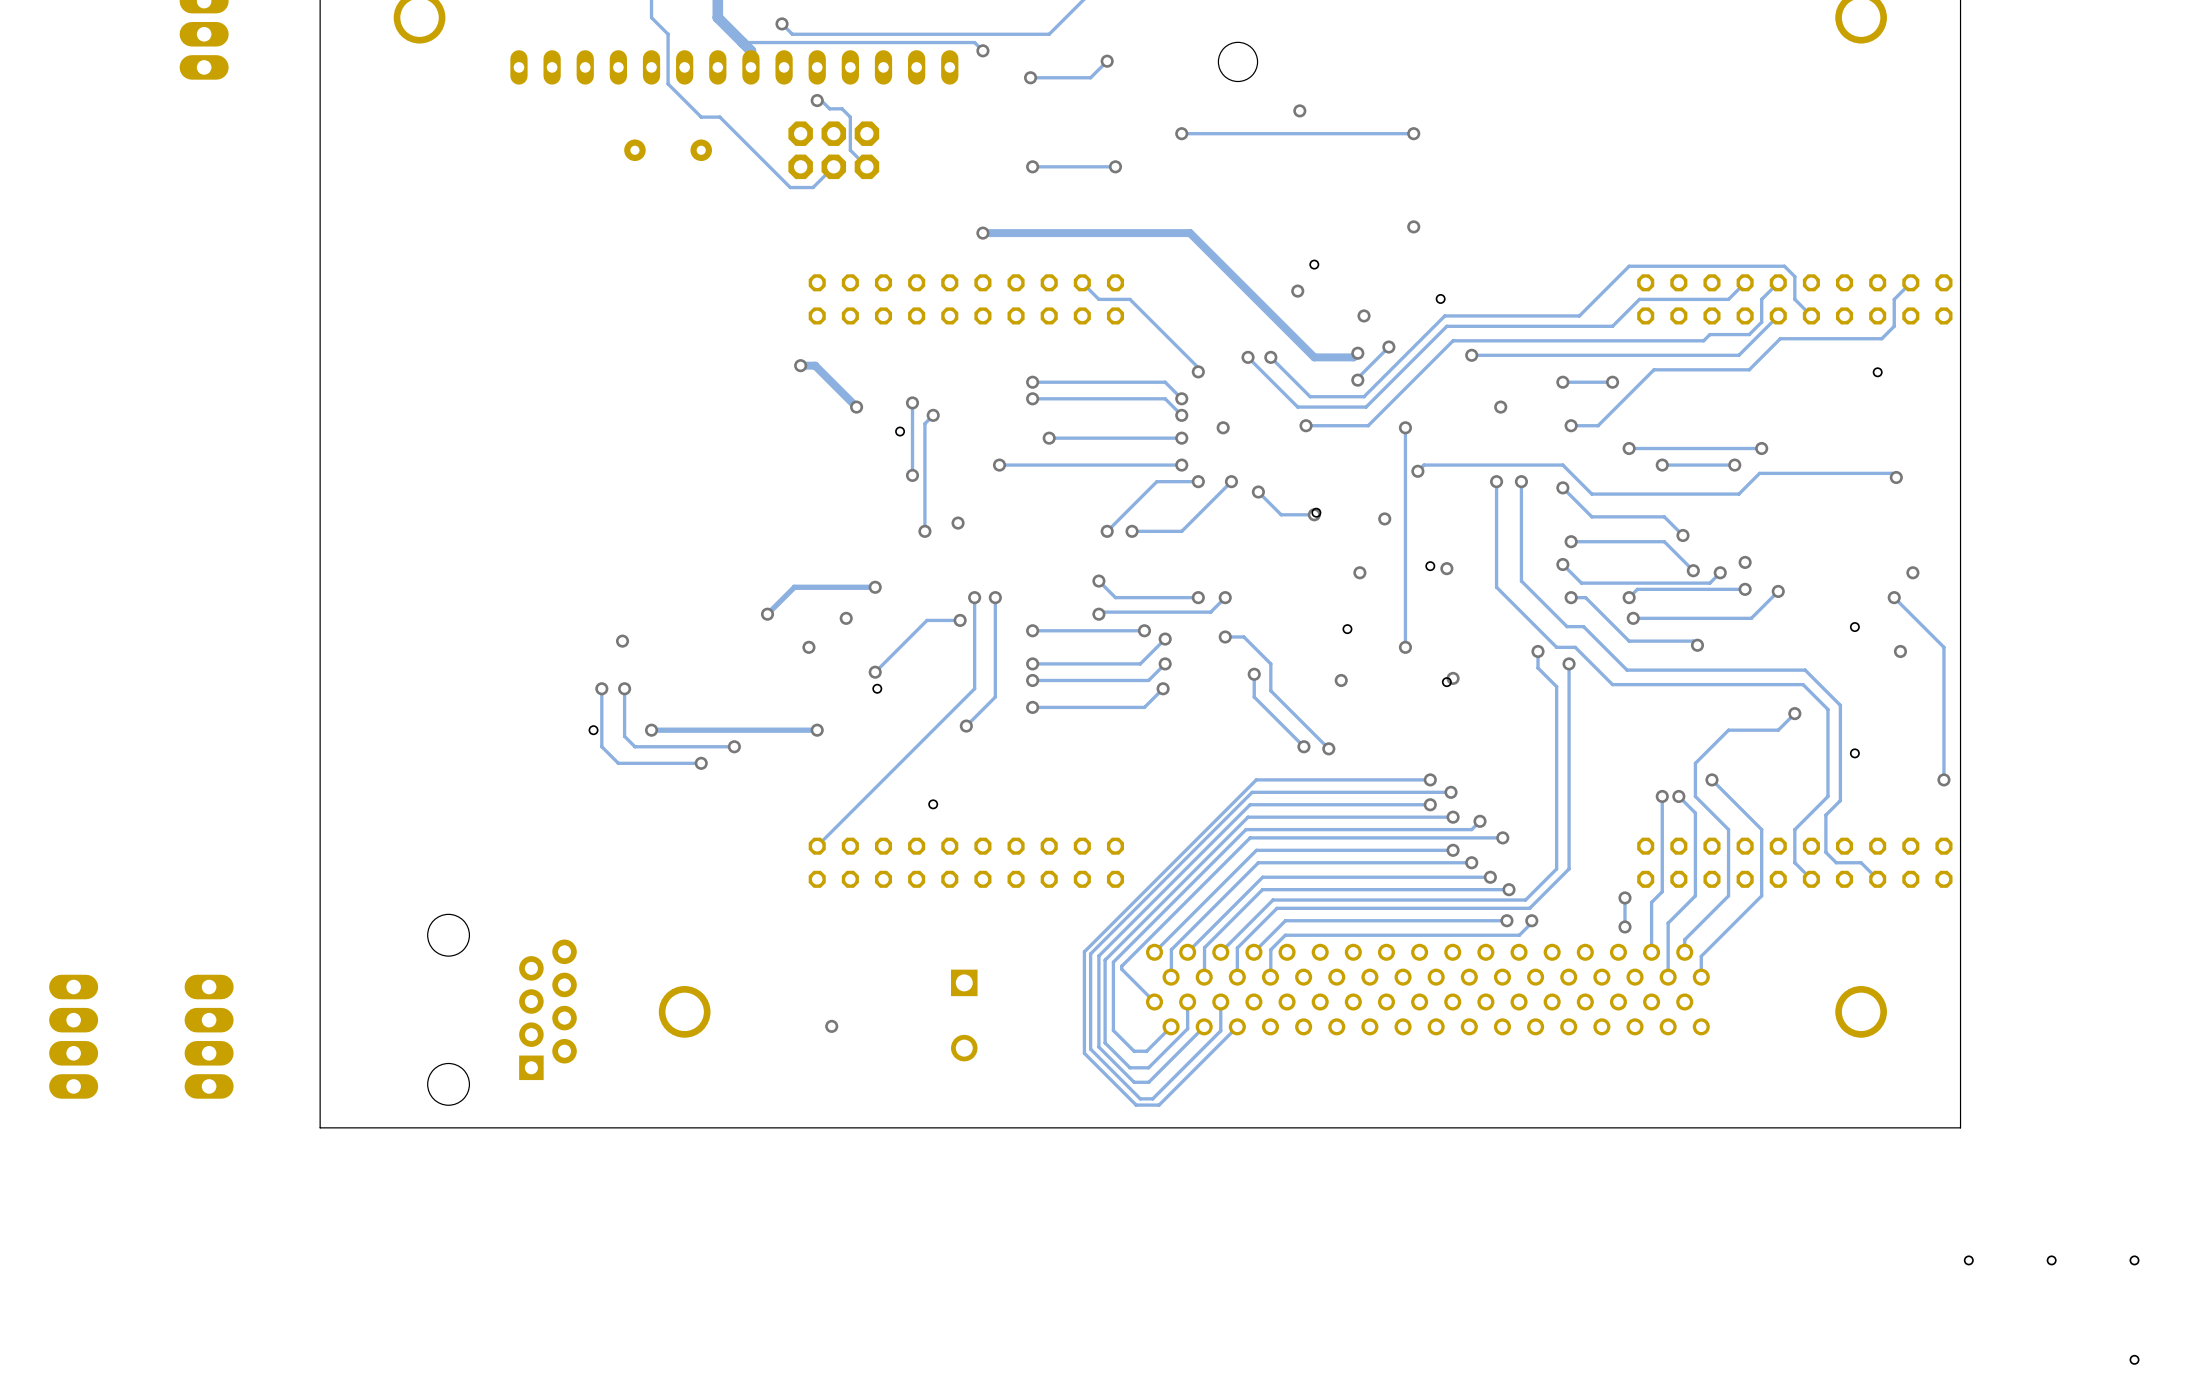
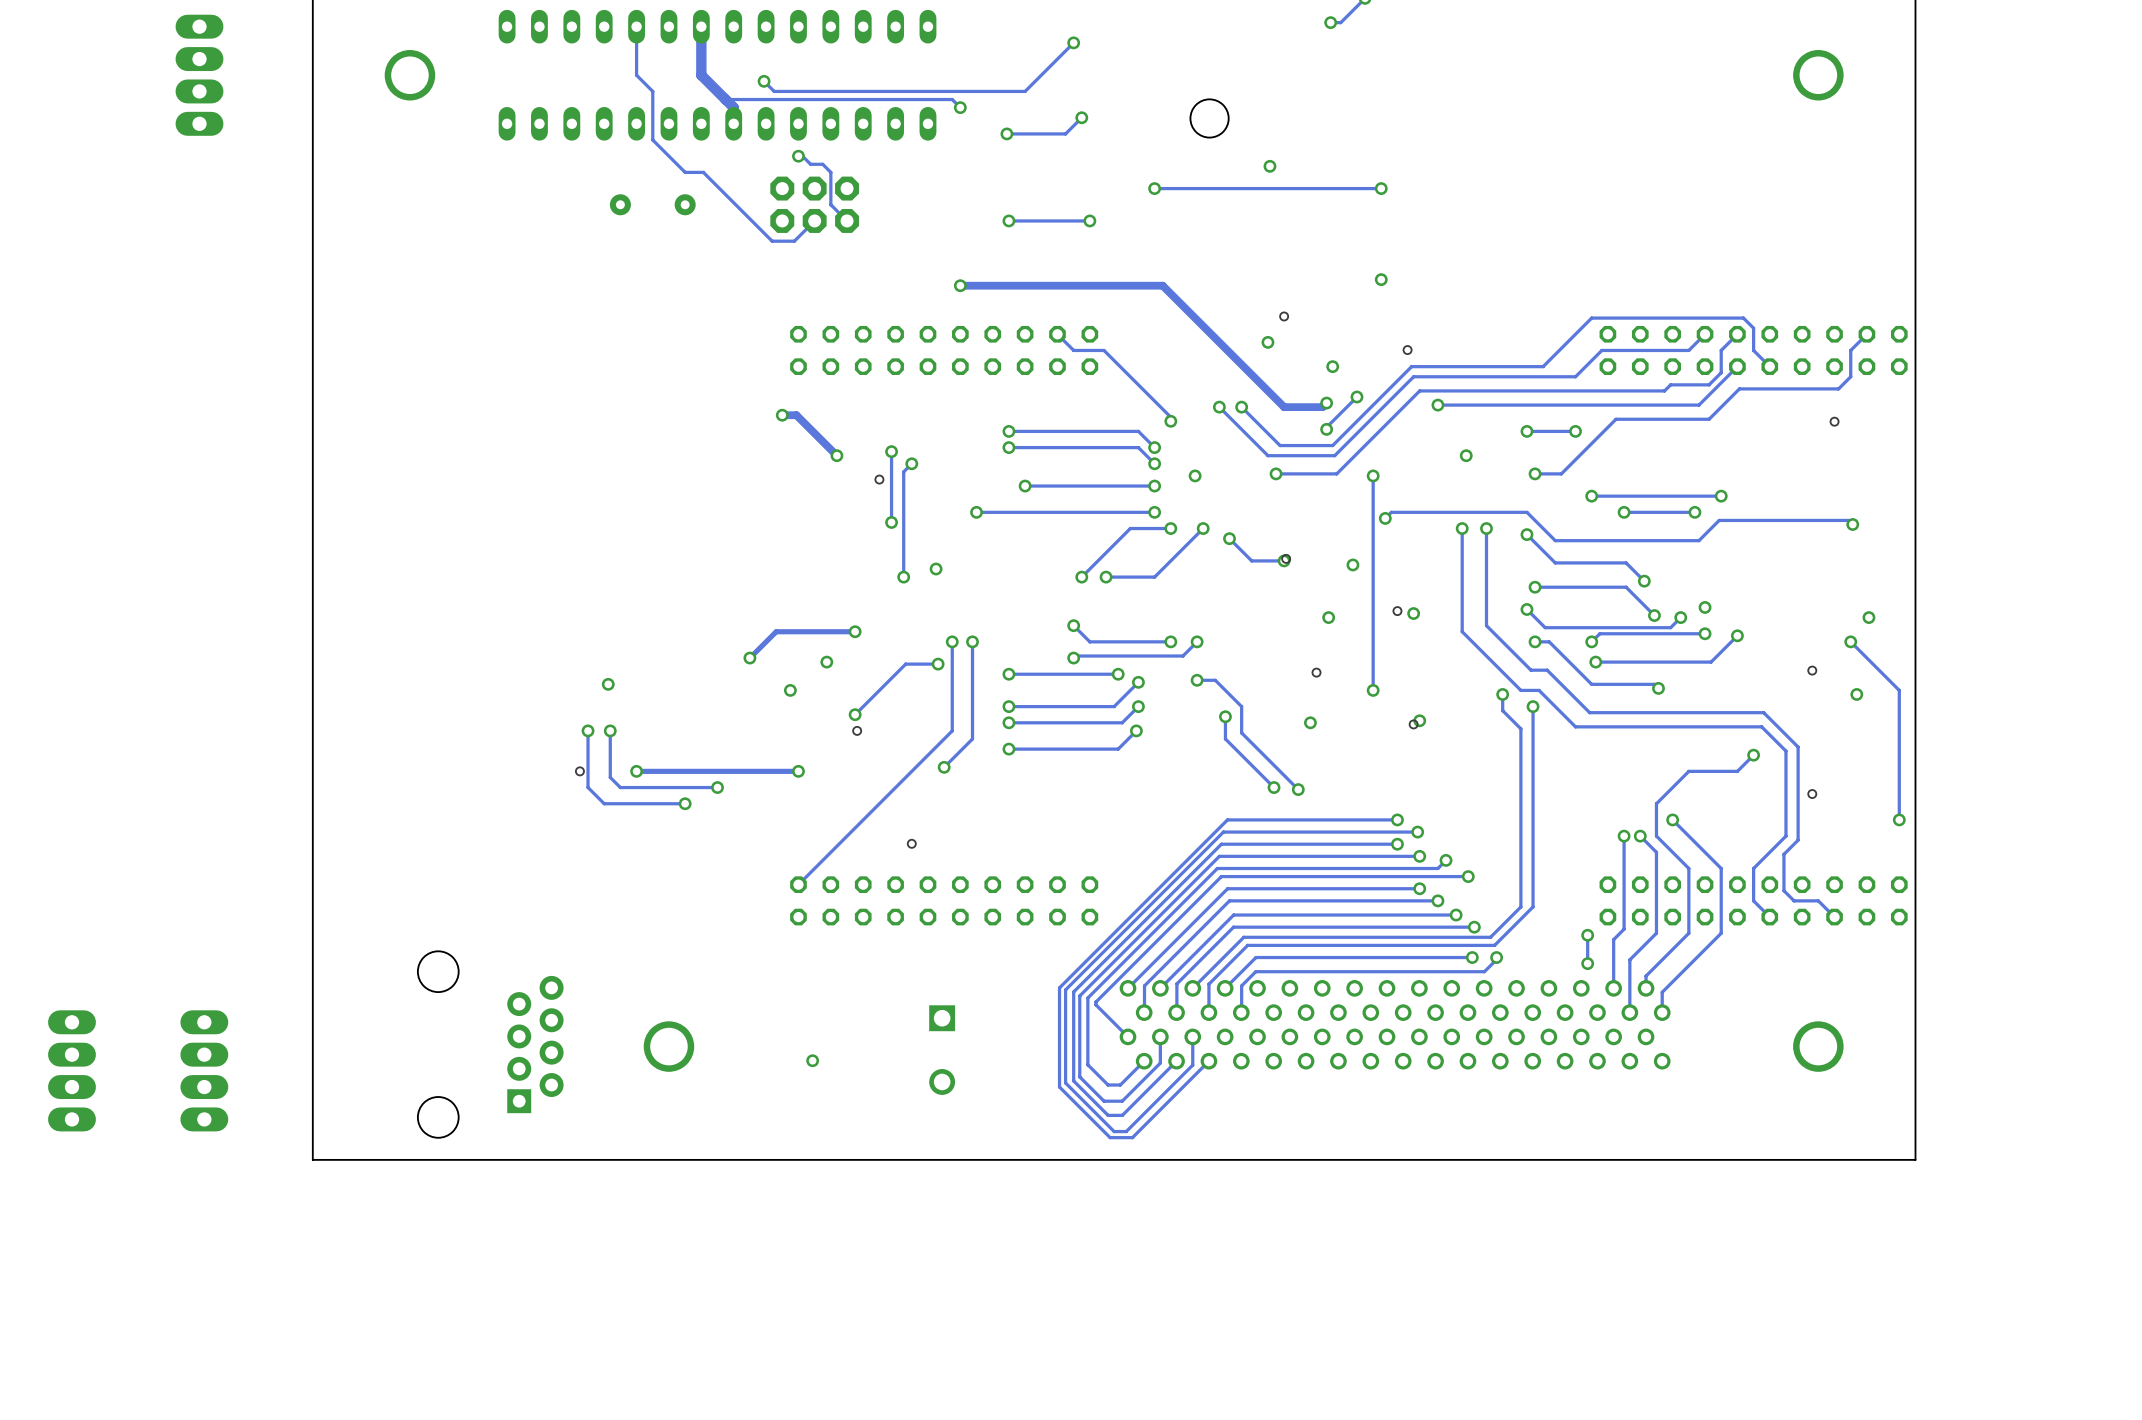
part: (1968, 1260) -> none
part: (2051, 1260) -> none
part: (2134, 1260) -> none
part: (2134, 1359) -> none

